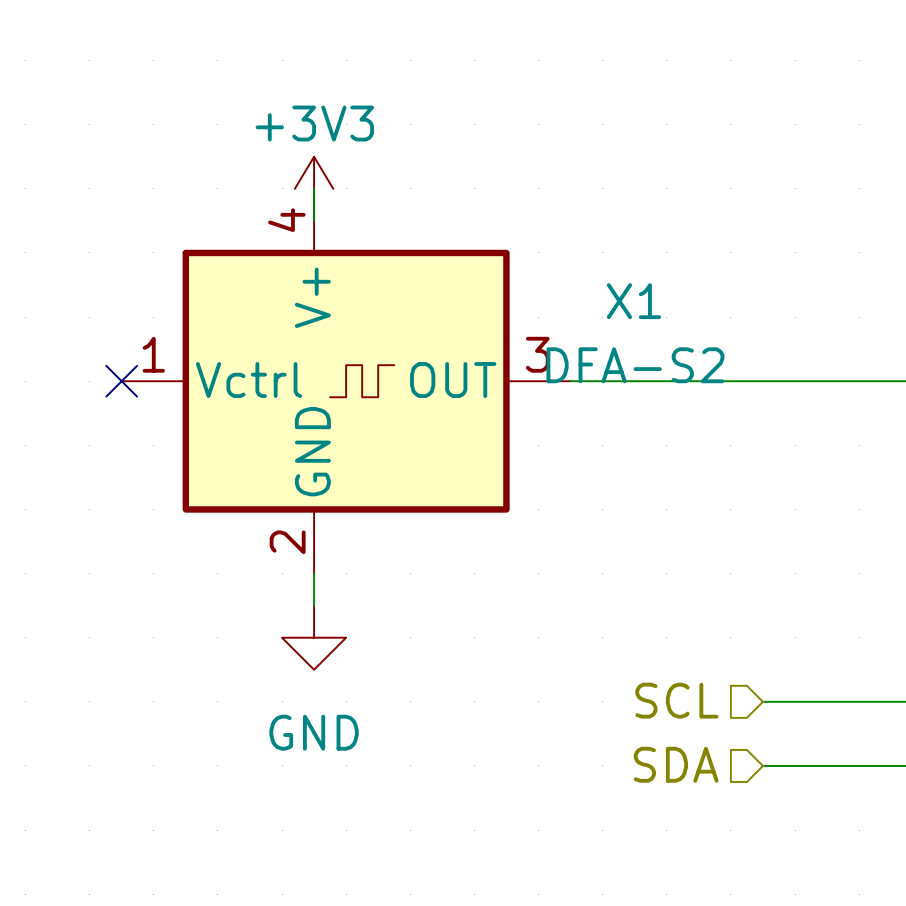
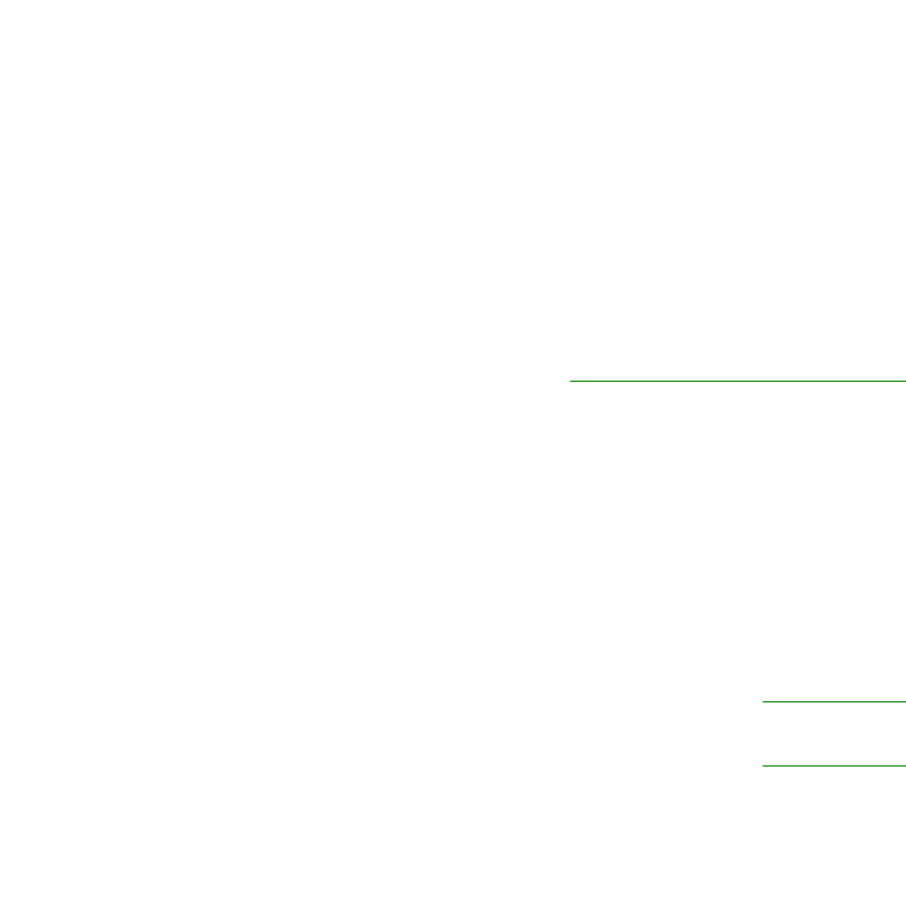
wire: (314, 188) (314, 220) -> none
power symbol: +3V3 (314, 188) -> none
no-connect mark: (121, 381) -> none
X1: DFA-S2 (346, 381) -> none
wire: (314, 573) (314, 605) -> none
power symbol: GND (314, 637) -> none
hierarchical label: SCL (676, 700) -> none
hierarchical label: SDA (676, 764) -> none

